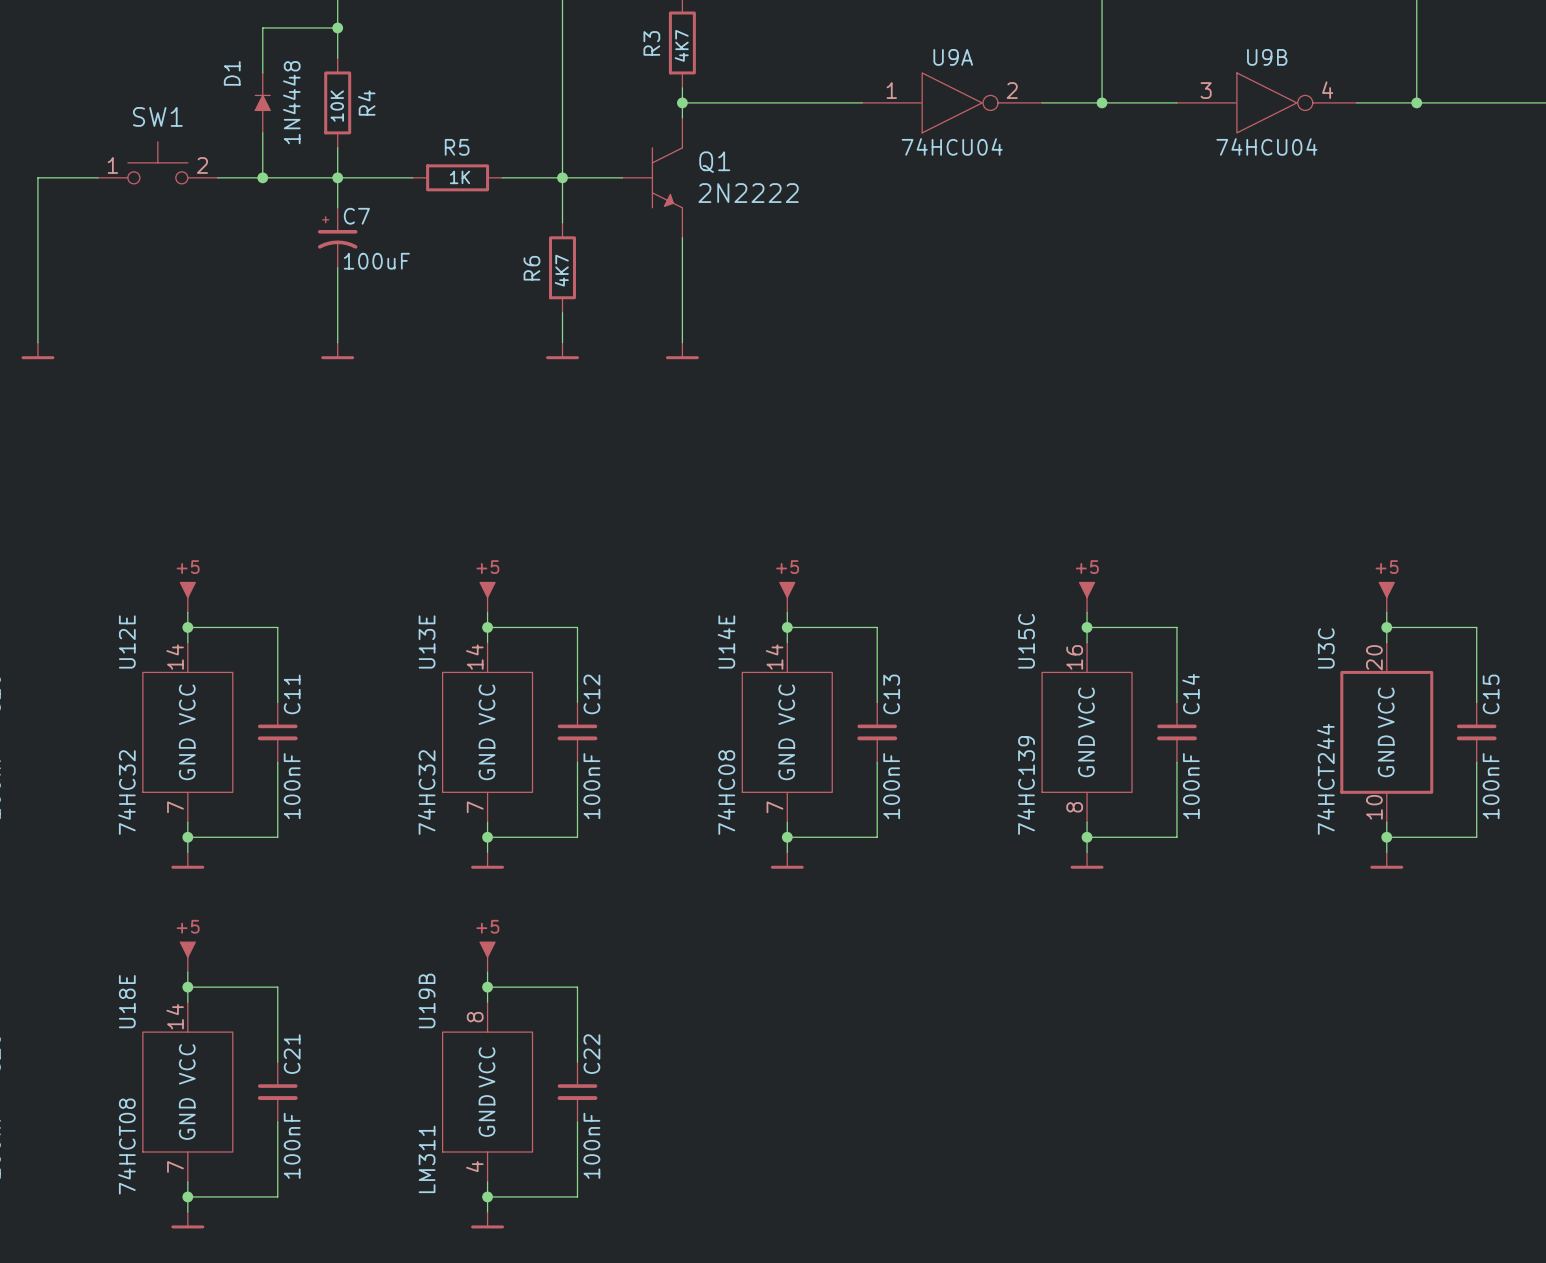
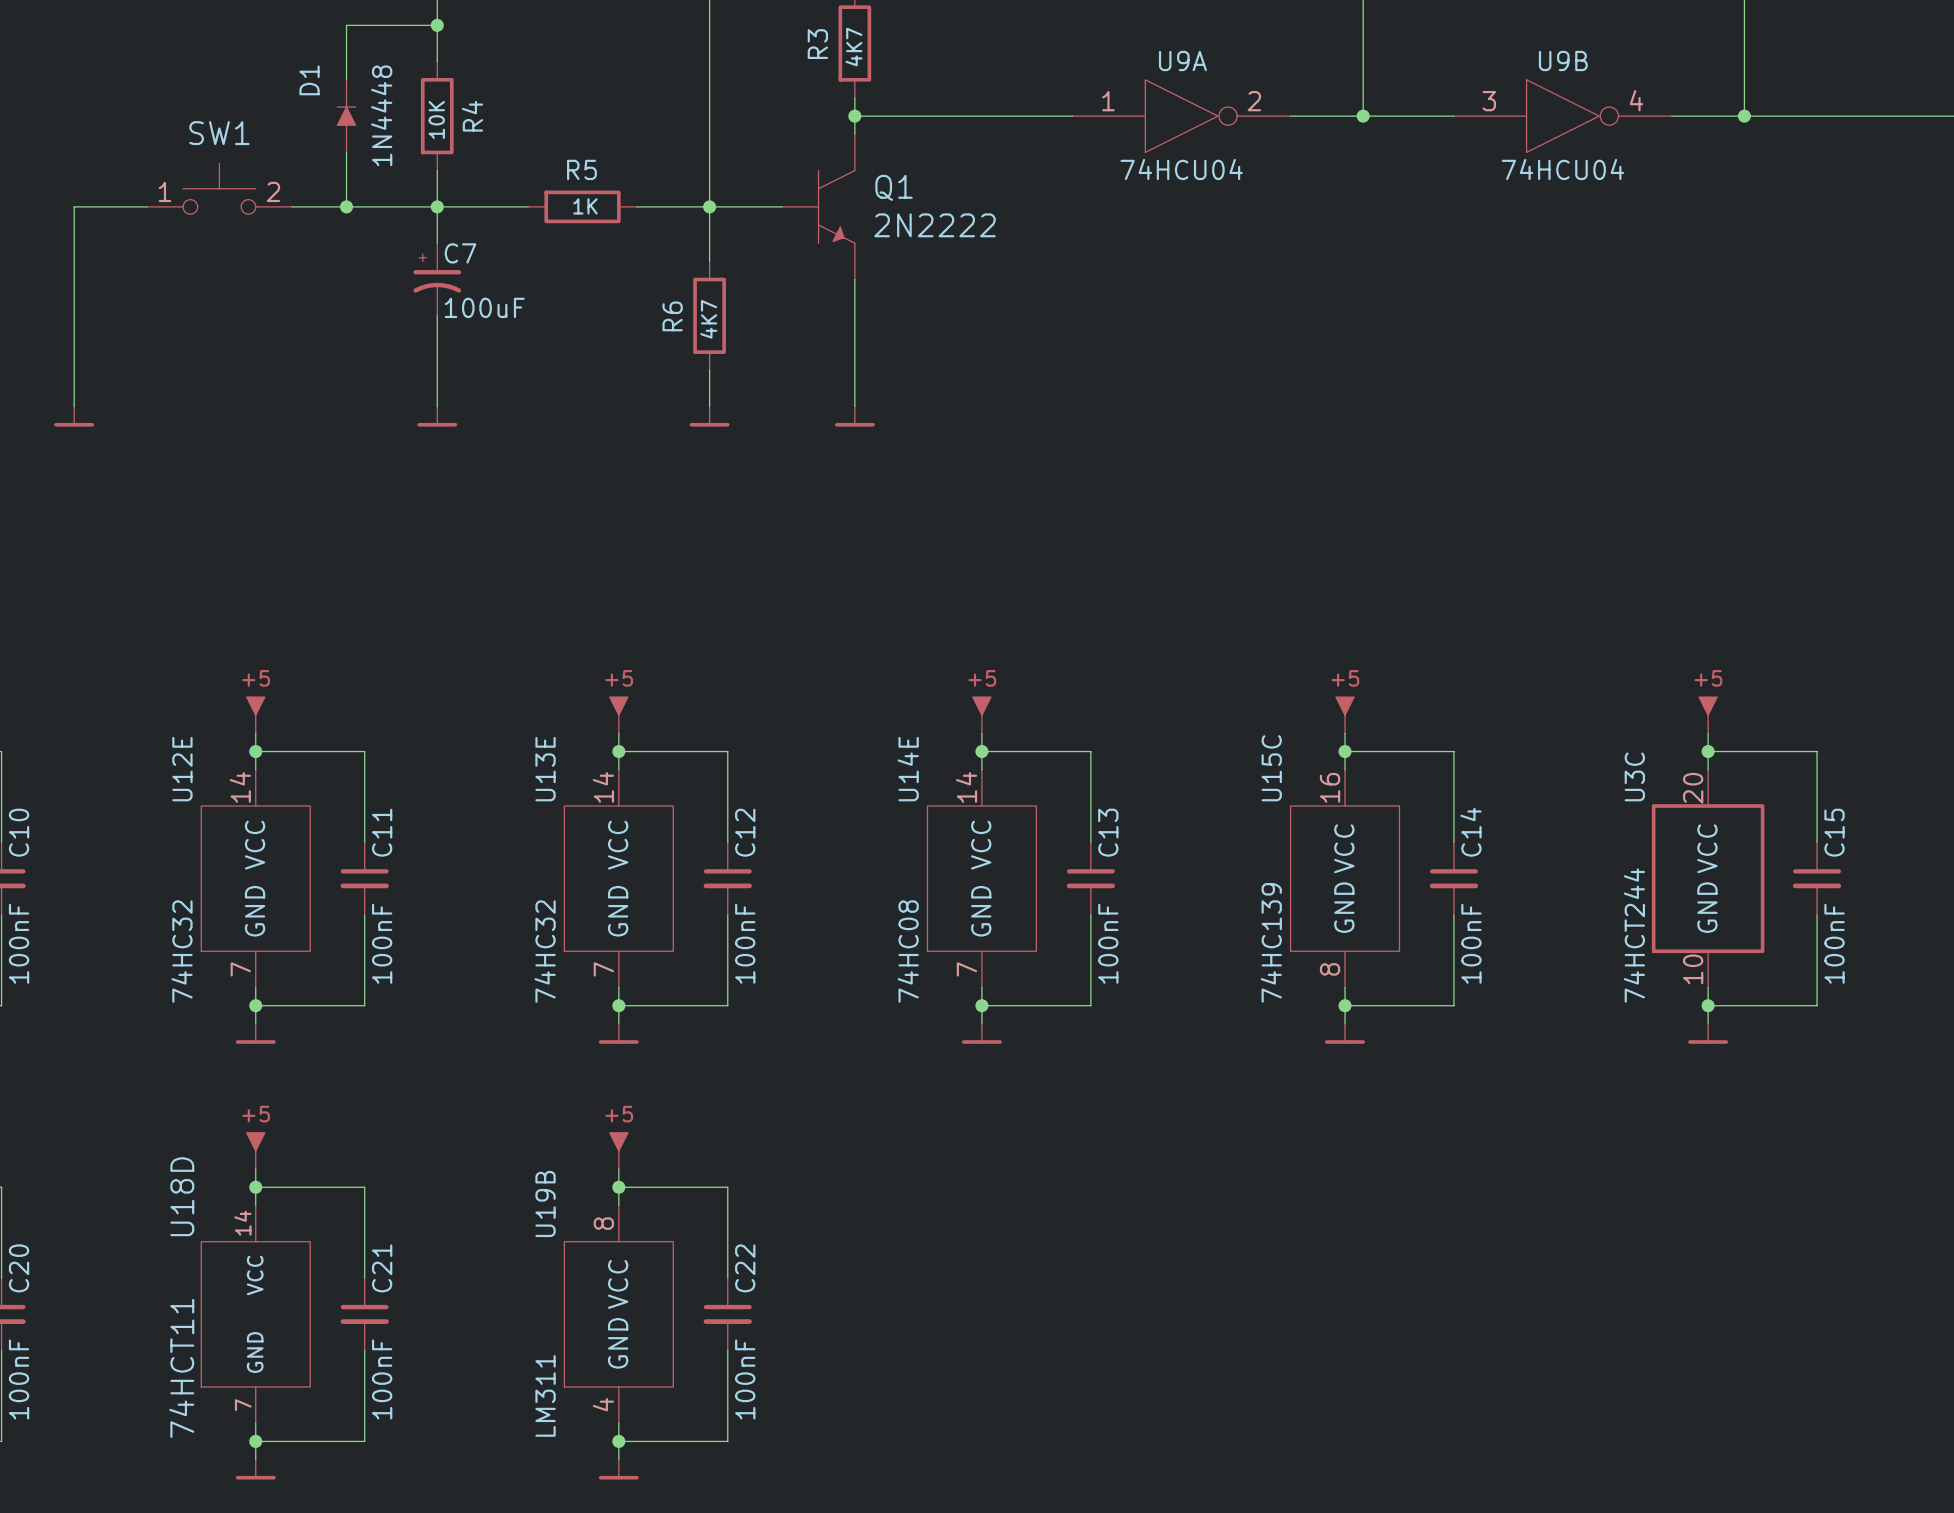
U18E name: U18E (127, 1001) -> U18D (182, 1196)
U18E symbol: [142, 1002, 233, 1182] -> [201, 1205, 311, 1424]
U18E value: 74HCT08 (126, 1146) -> 74HCT11 (181, 1368)

